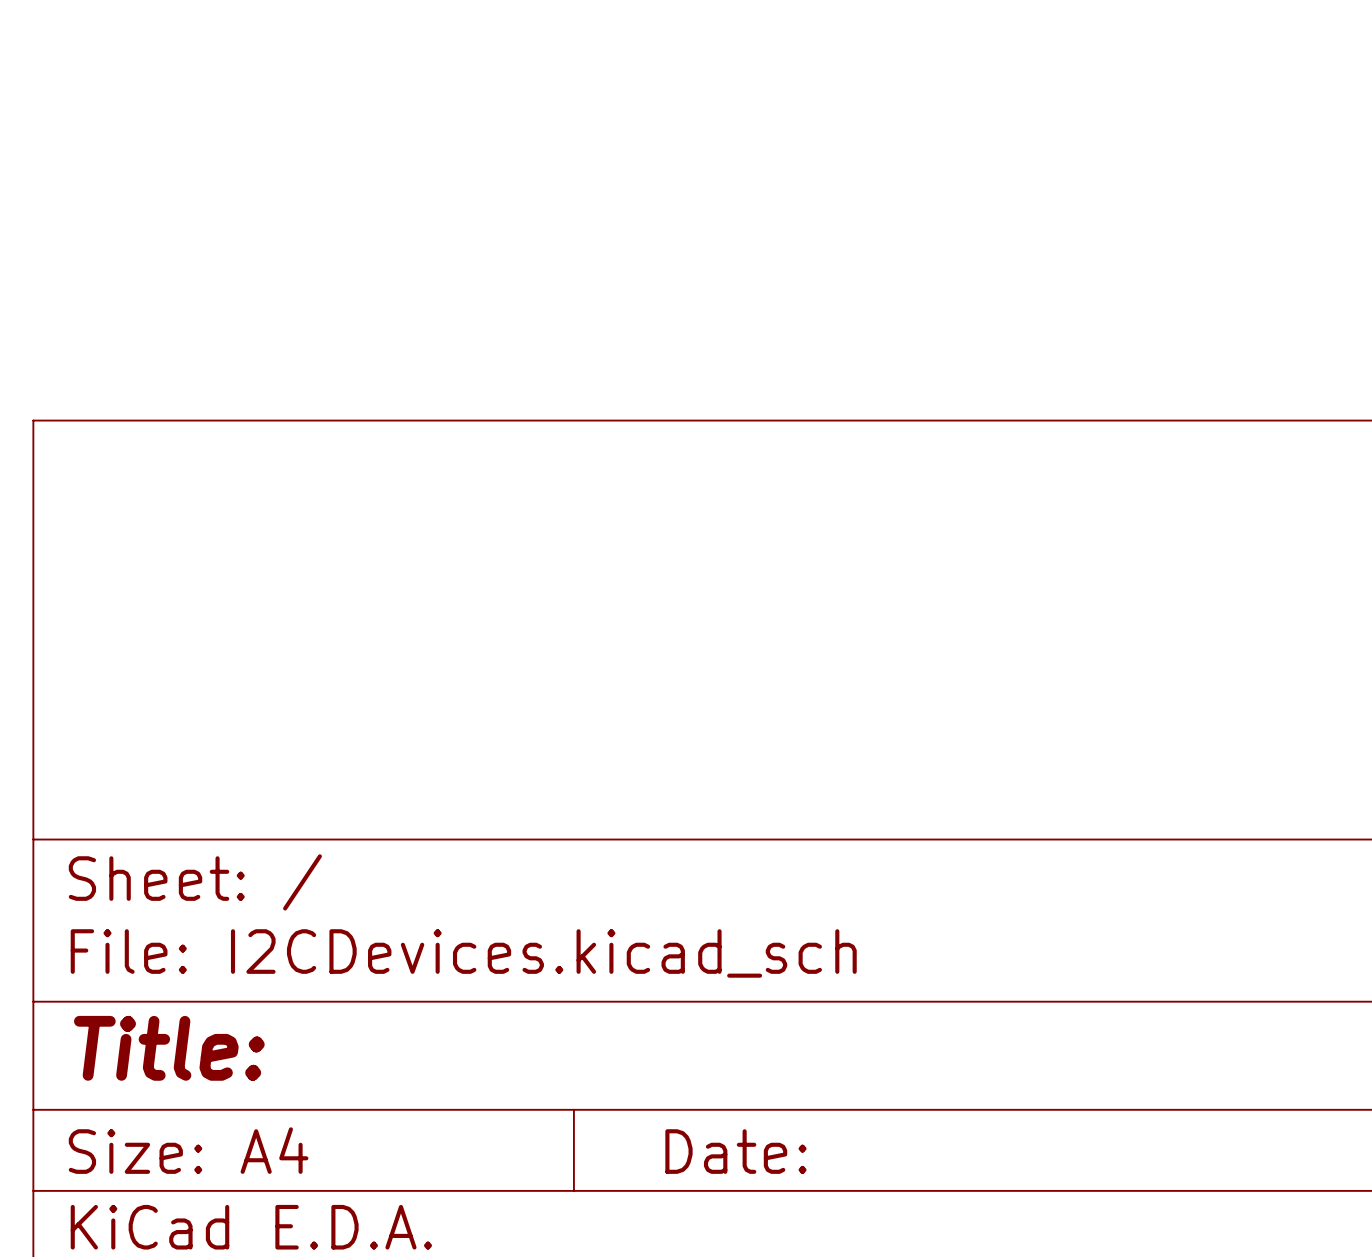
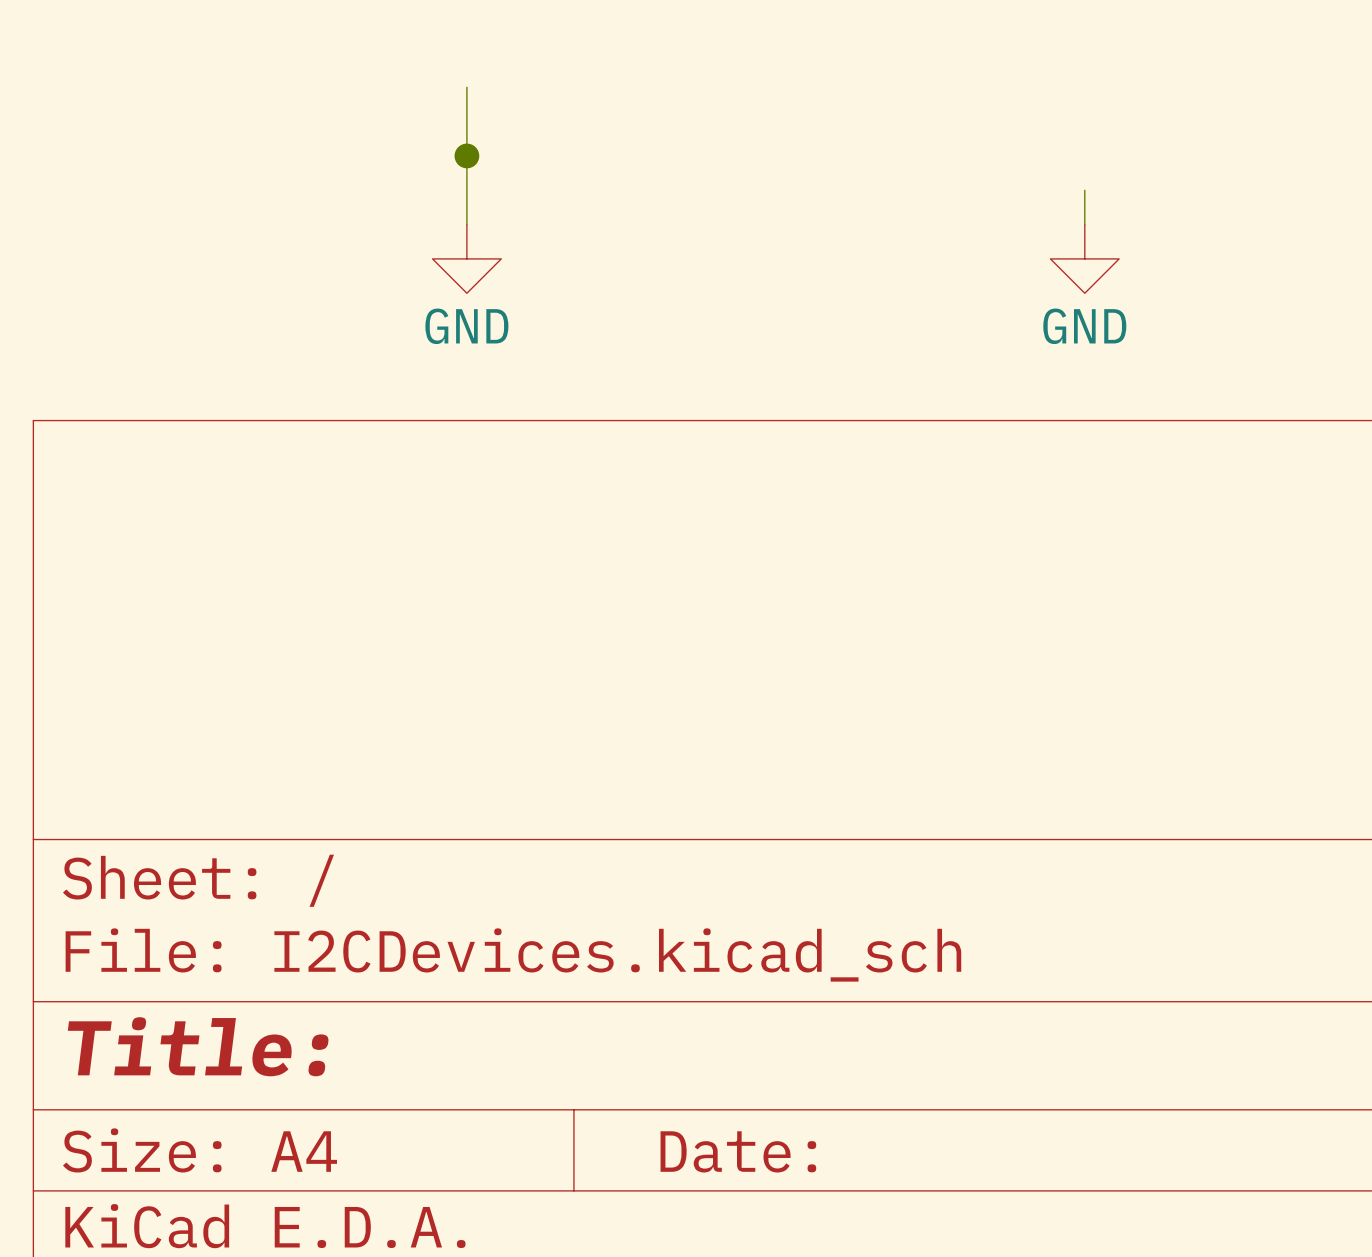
wire: none -> (466, 87) (466, 224)
junction: none -> (466, 155)
wire: none -> (1084, 190) (1084, 224)
power symbol: none -> GND (466, 258)
power symbol: none -> GND (1084, 258)

